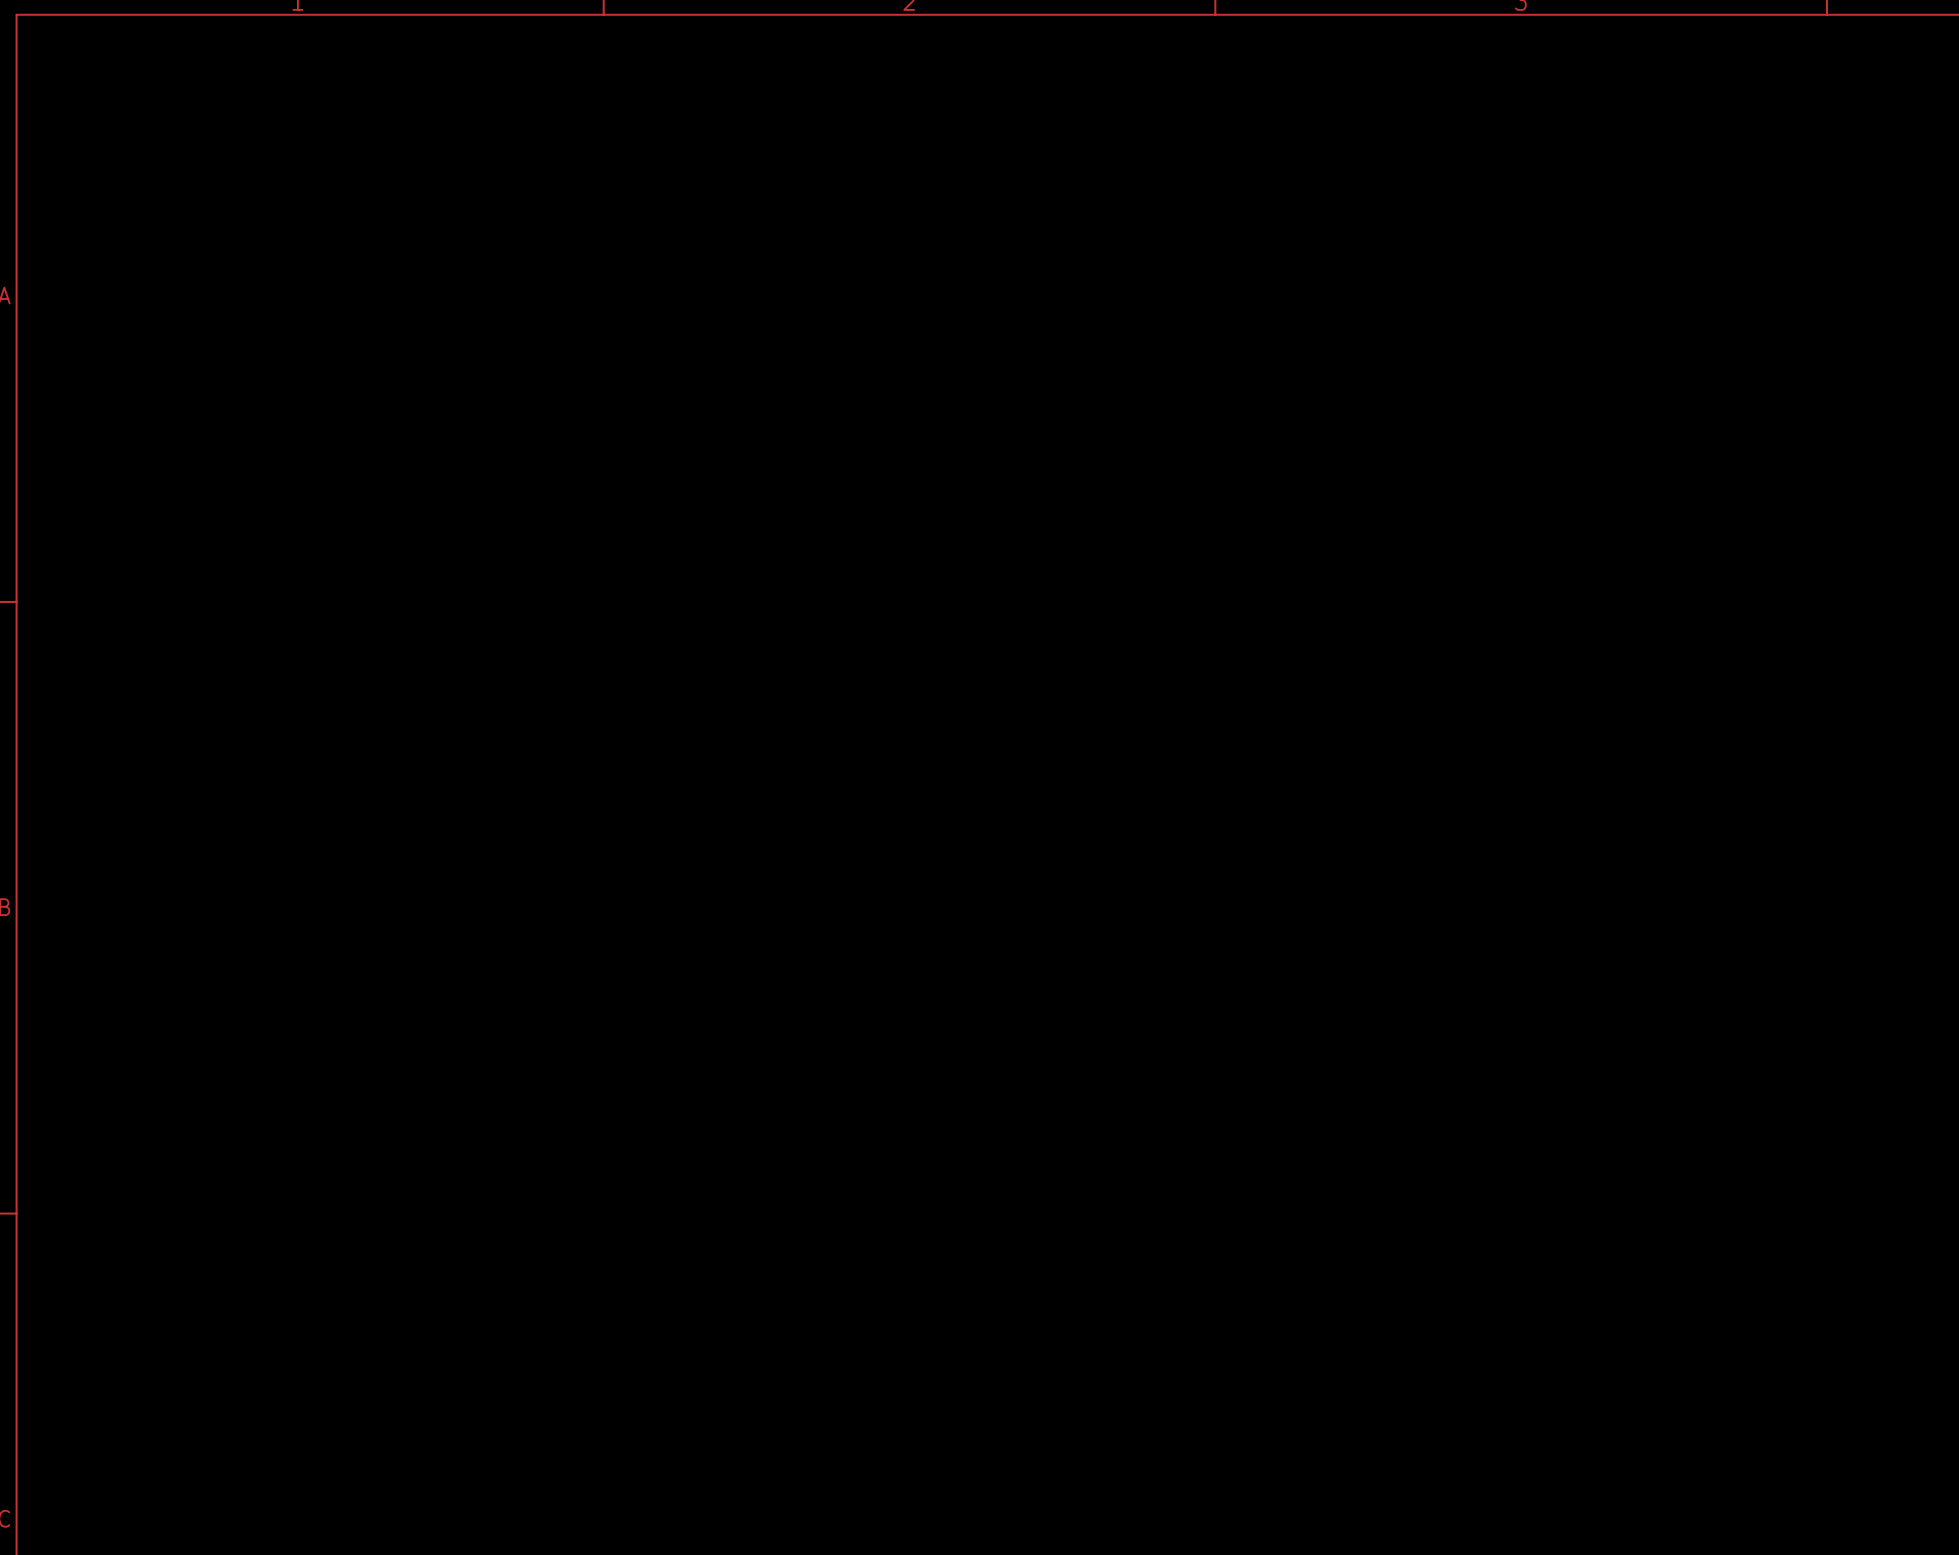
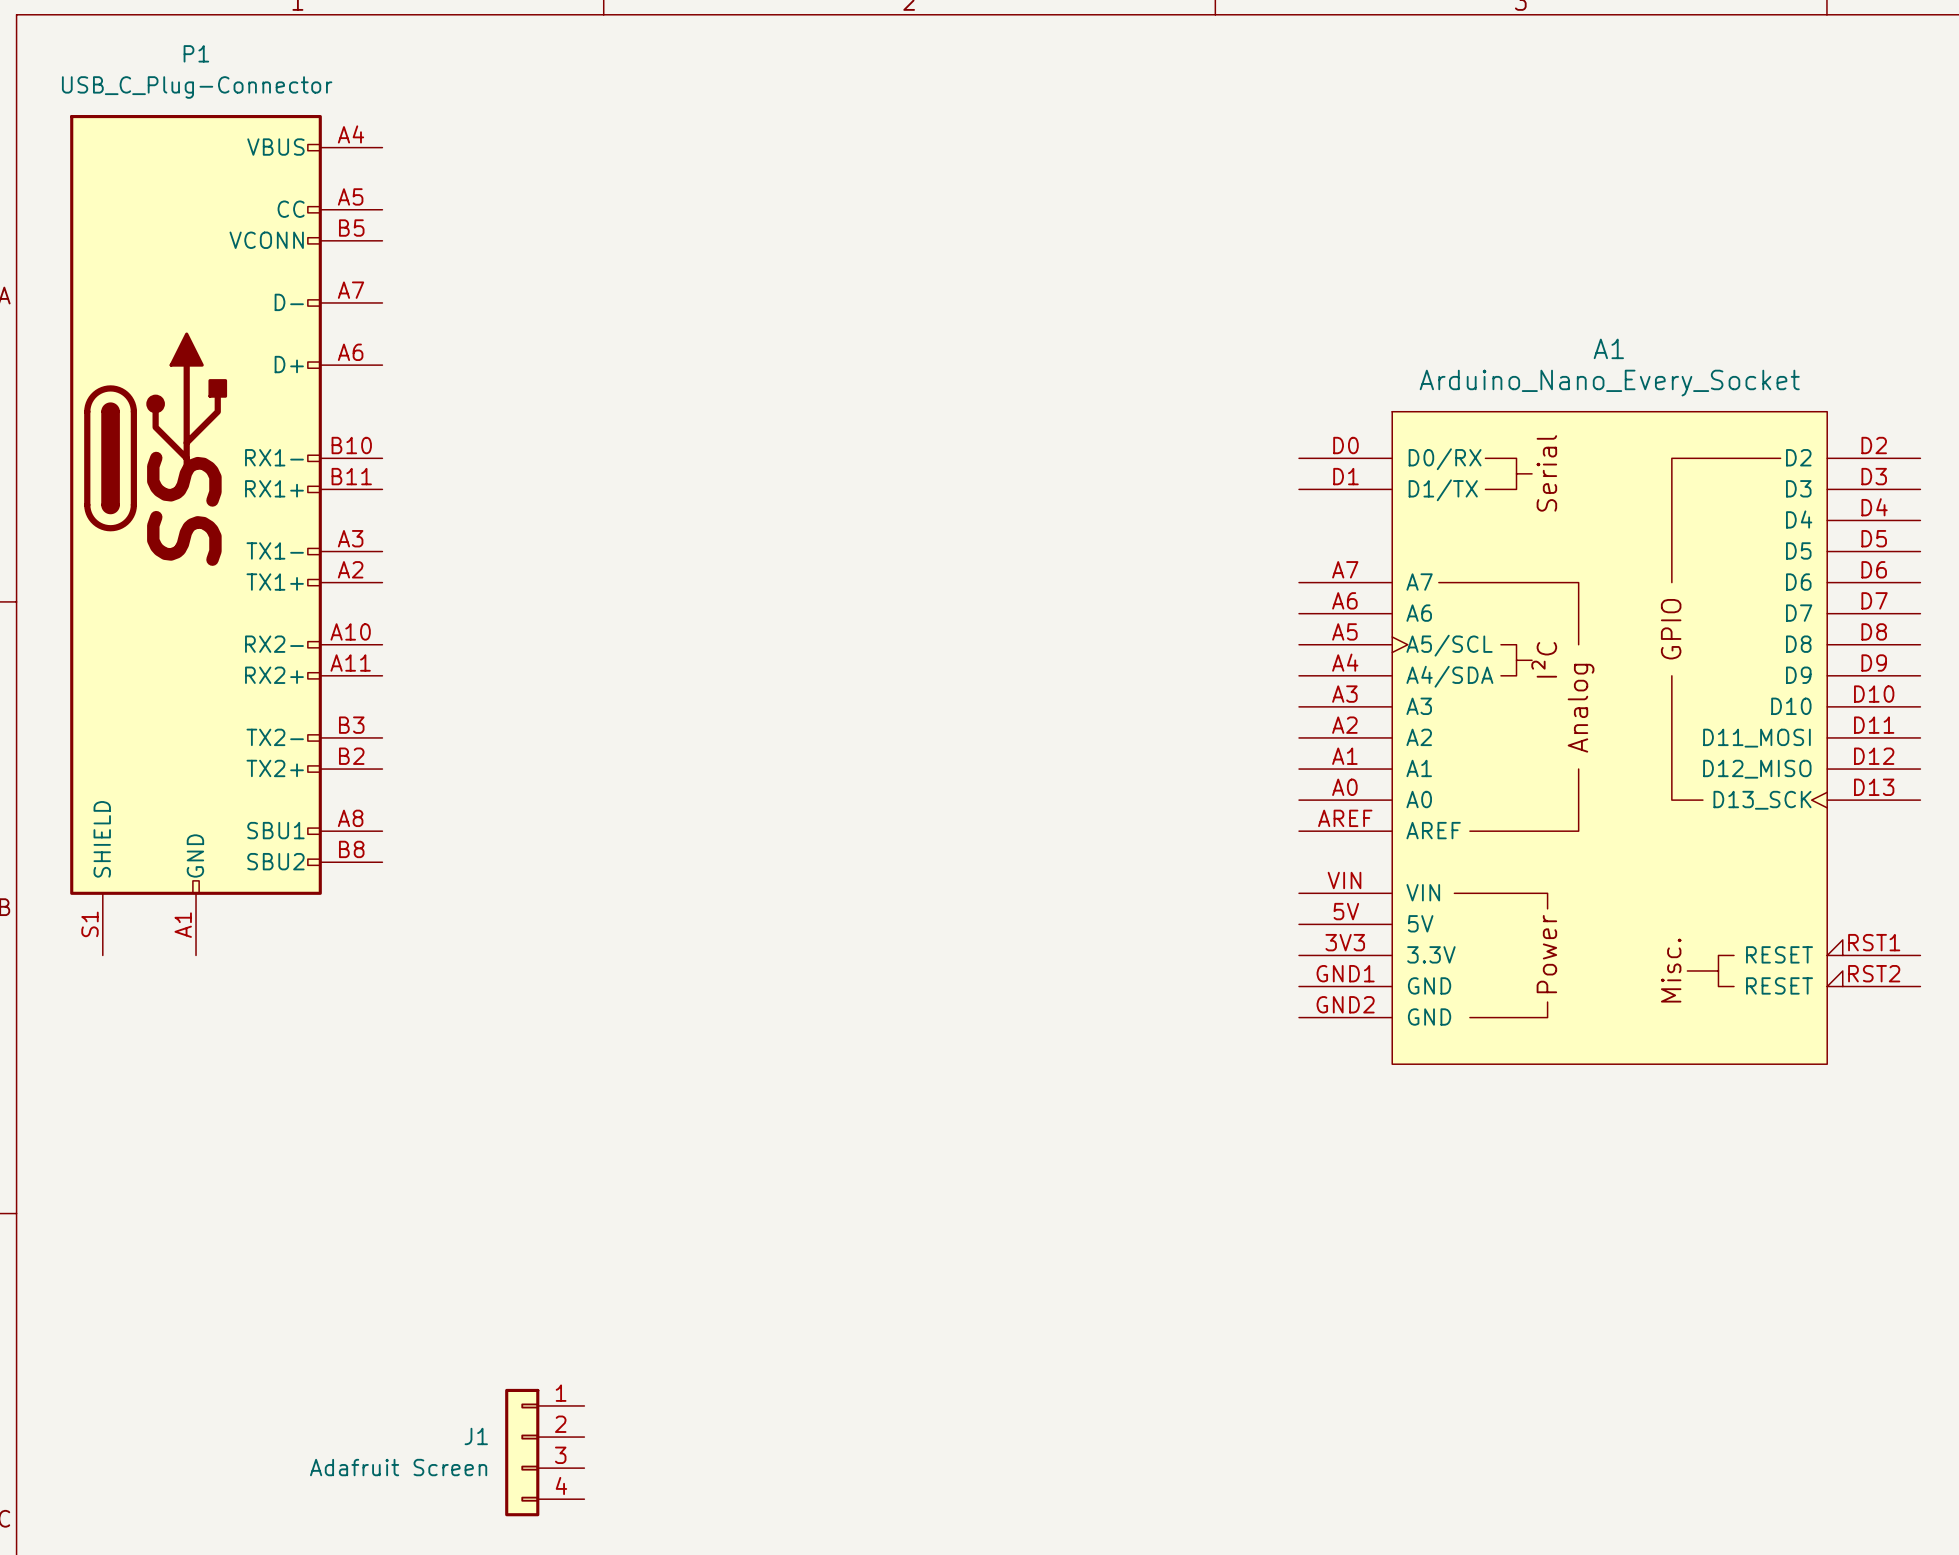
P1: none -> USB_C_Plug-Connector (226, 535)
A1: none -> Arduino_Nano_Every_Socket (1609, 737)
J1: none -> Adafruit Screen (544, 1452)

